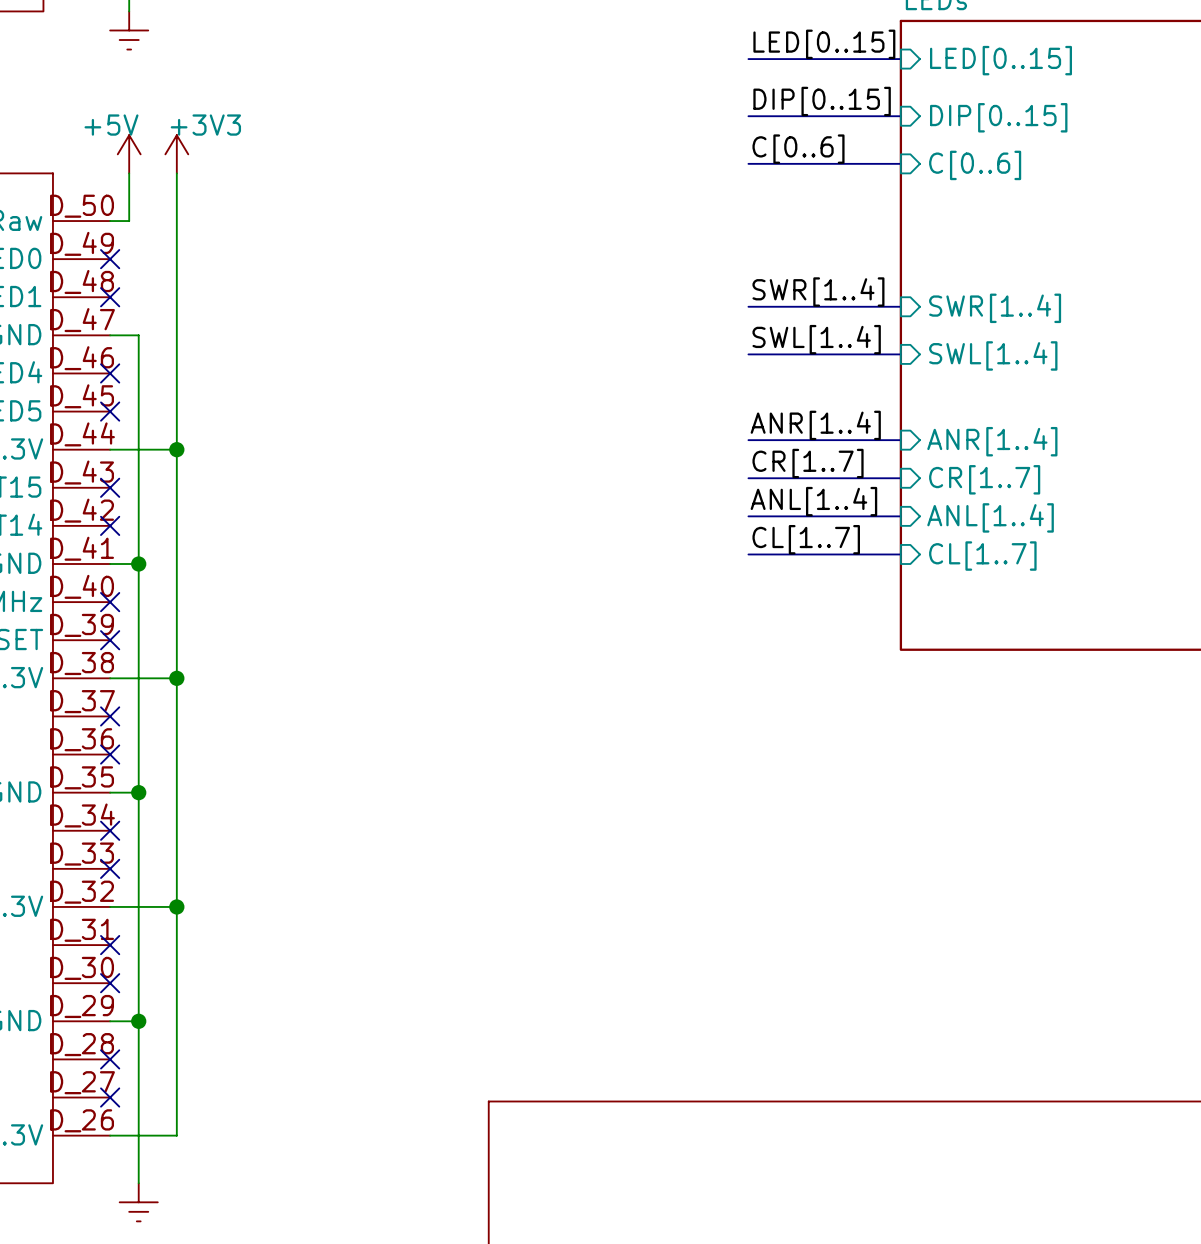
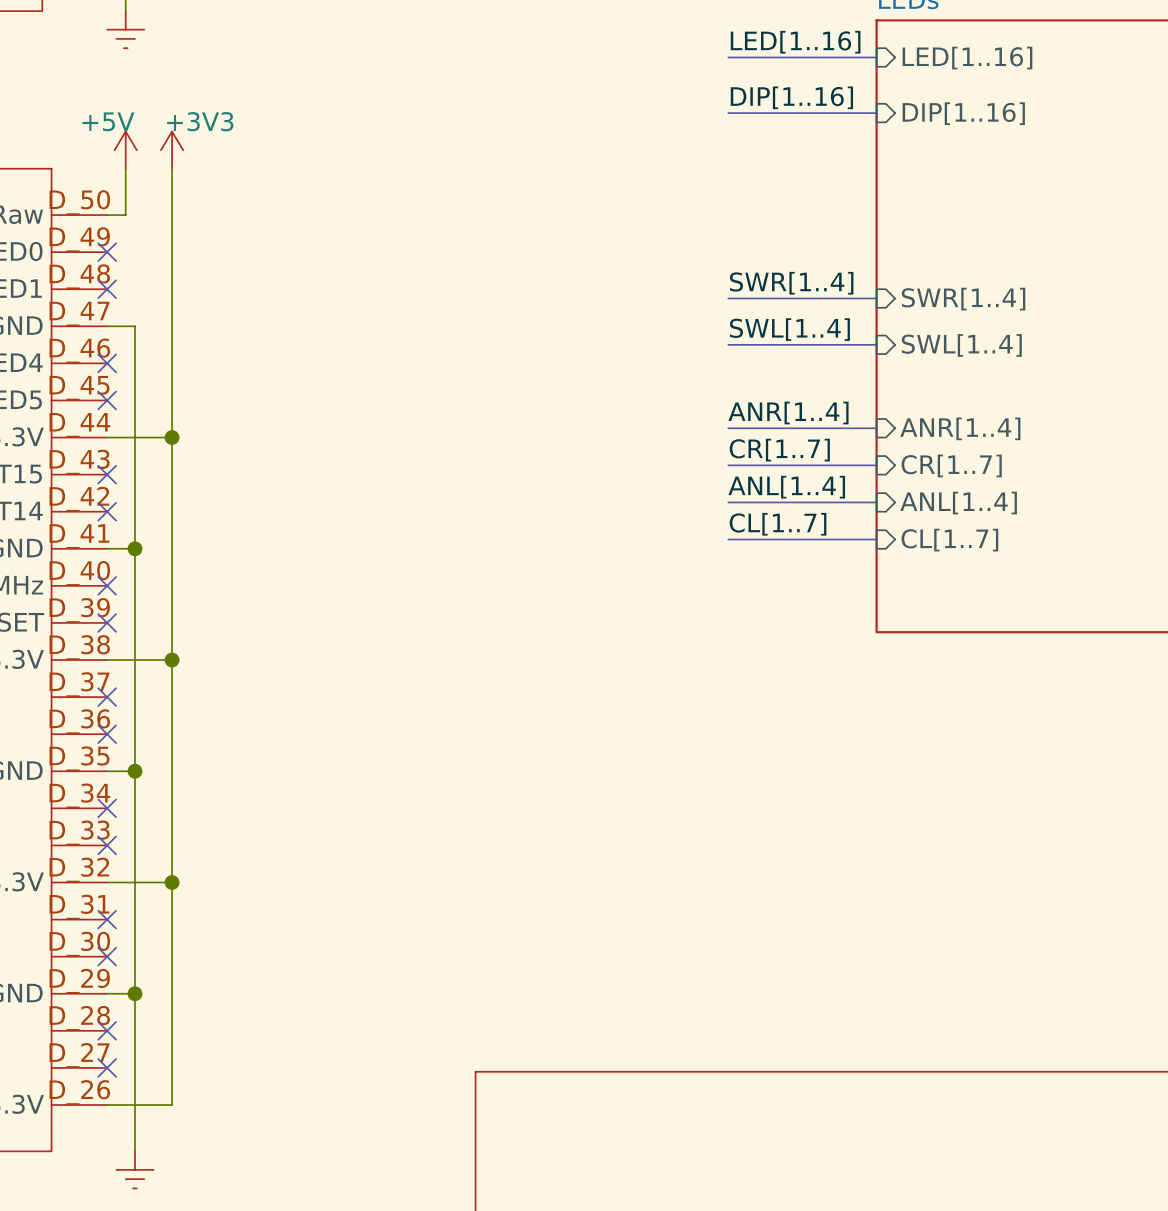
label: LED[0..15] (824, 44) -> LED[1..16] (795, 42)
sheet pin: LED[0..15] (1001, 60) -> LED[1..16] (967, 58)
label: DIP[0..15] (822, 101) -> DIP[1..16] (791, 97)
sheet pin: DIP[0..15] (998, 117) -> DIP[1..16] (963, 113)
label: C[0..6] (798, 149) -> none
bus: (748, 163) (900, 163) -> none
sheet pin: C[0..6] (975, 165) -> none

